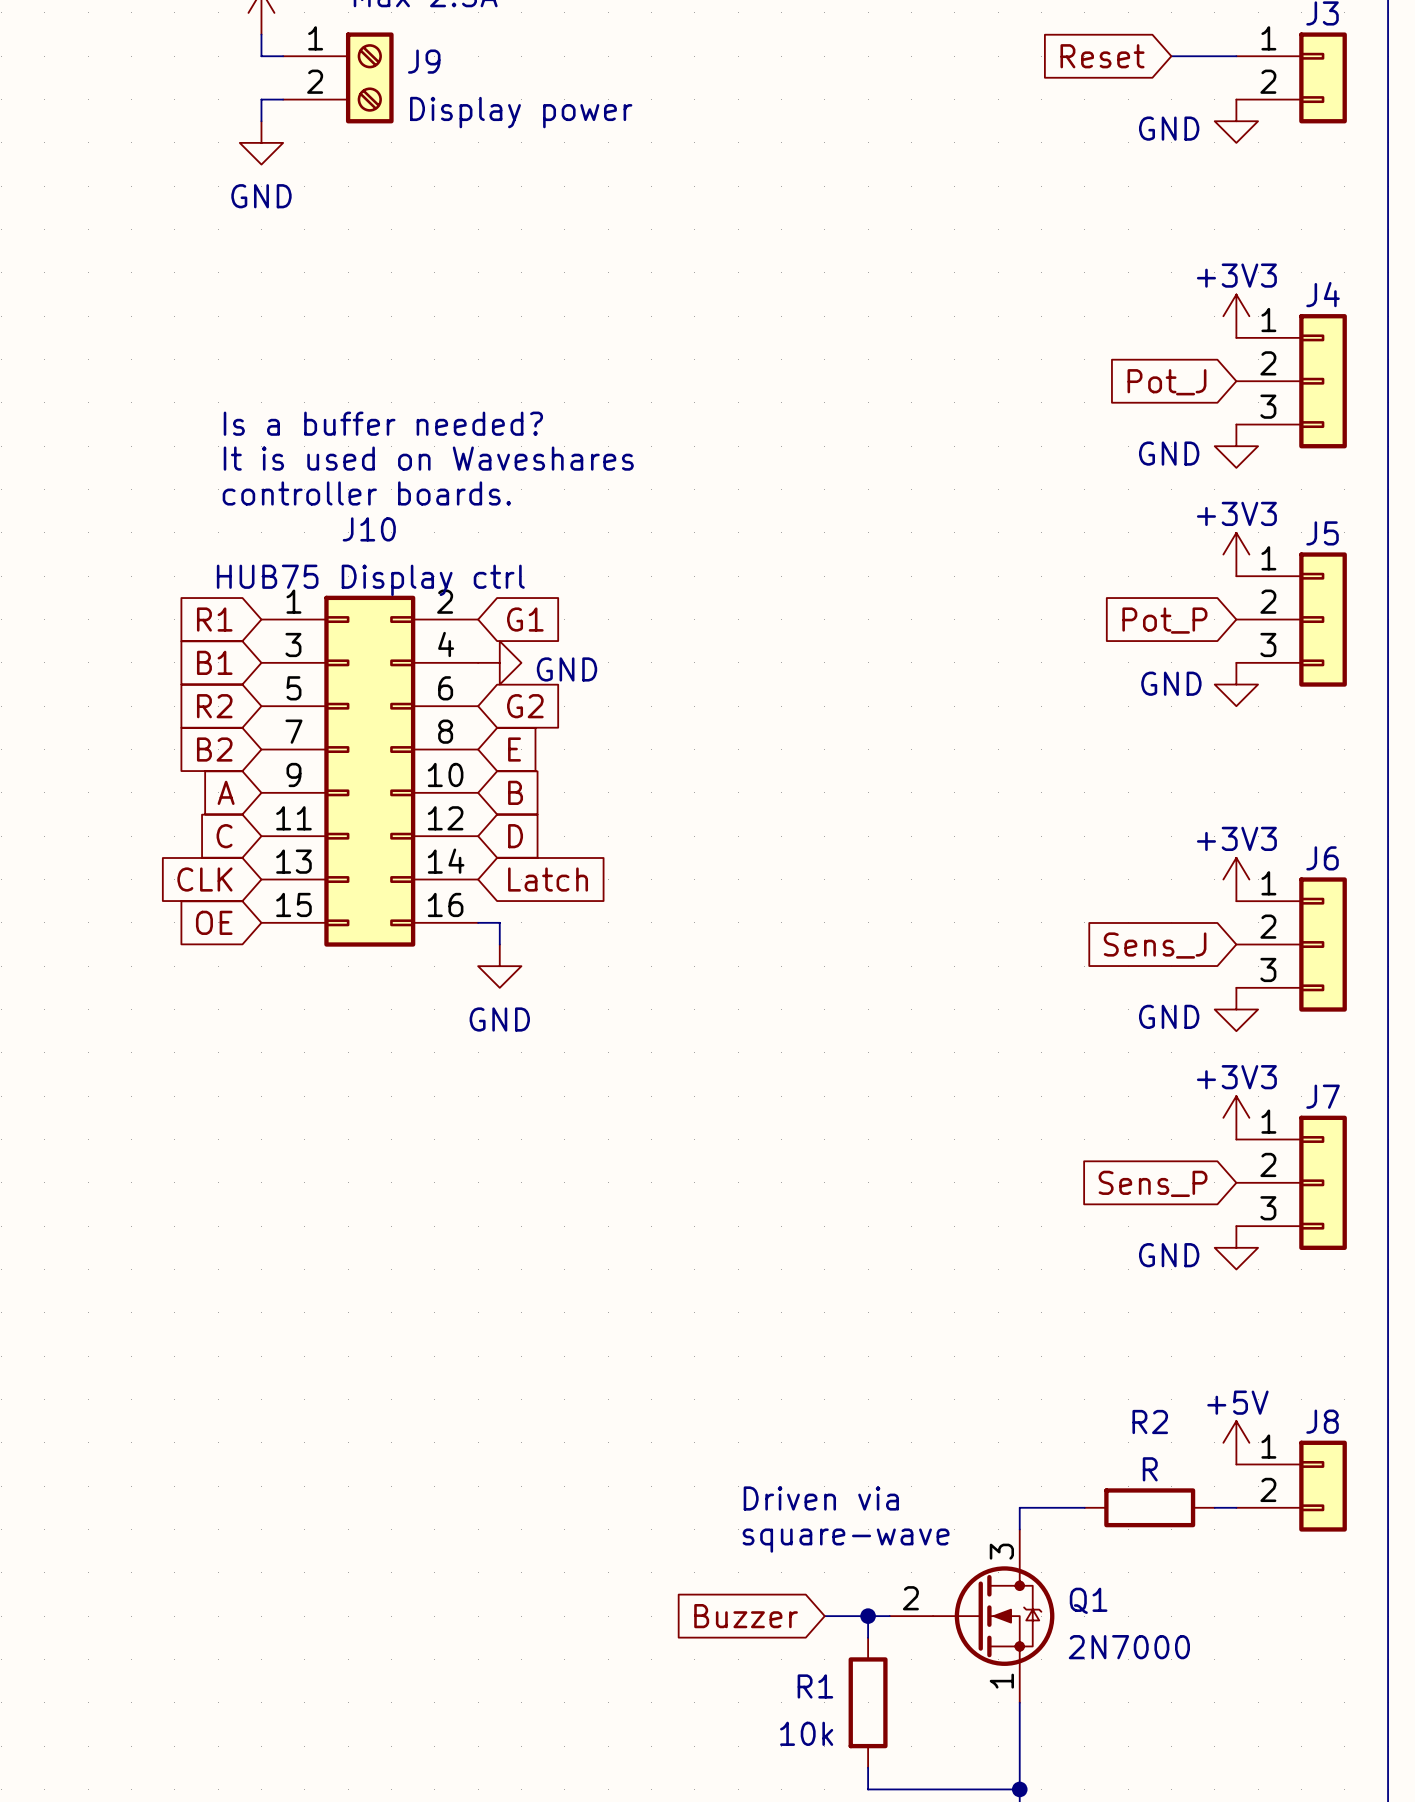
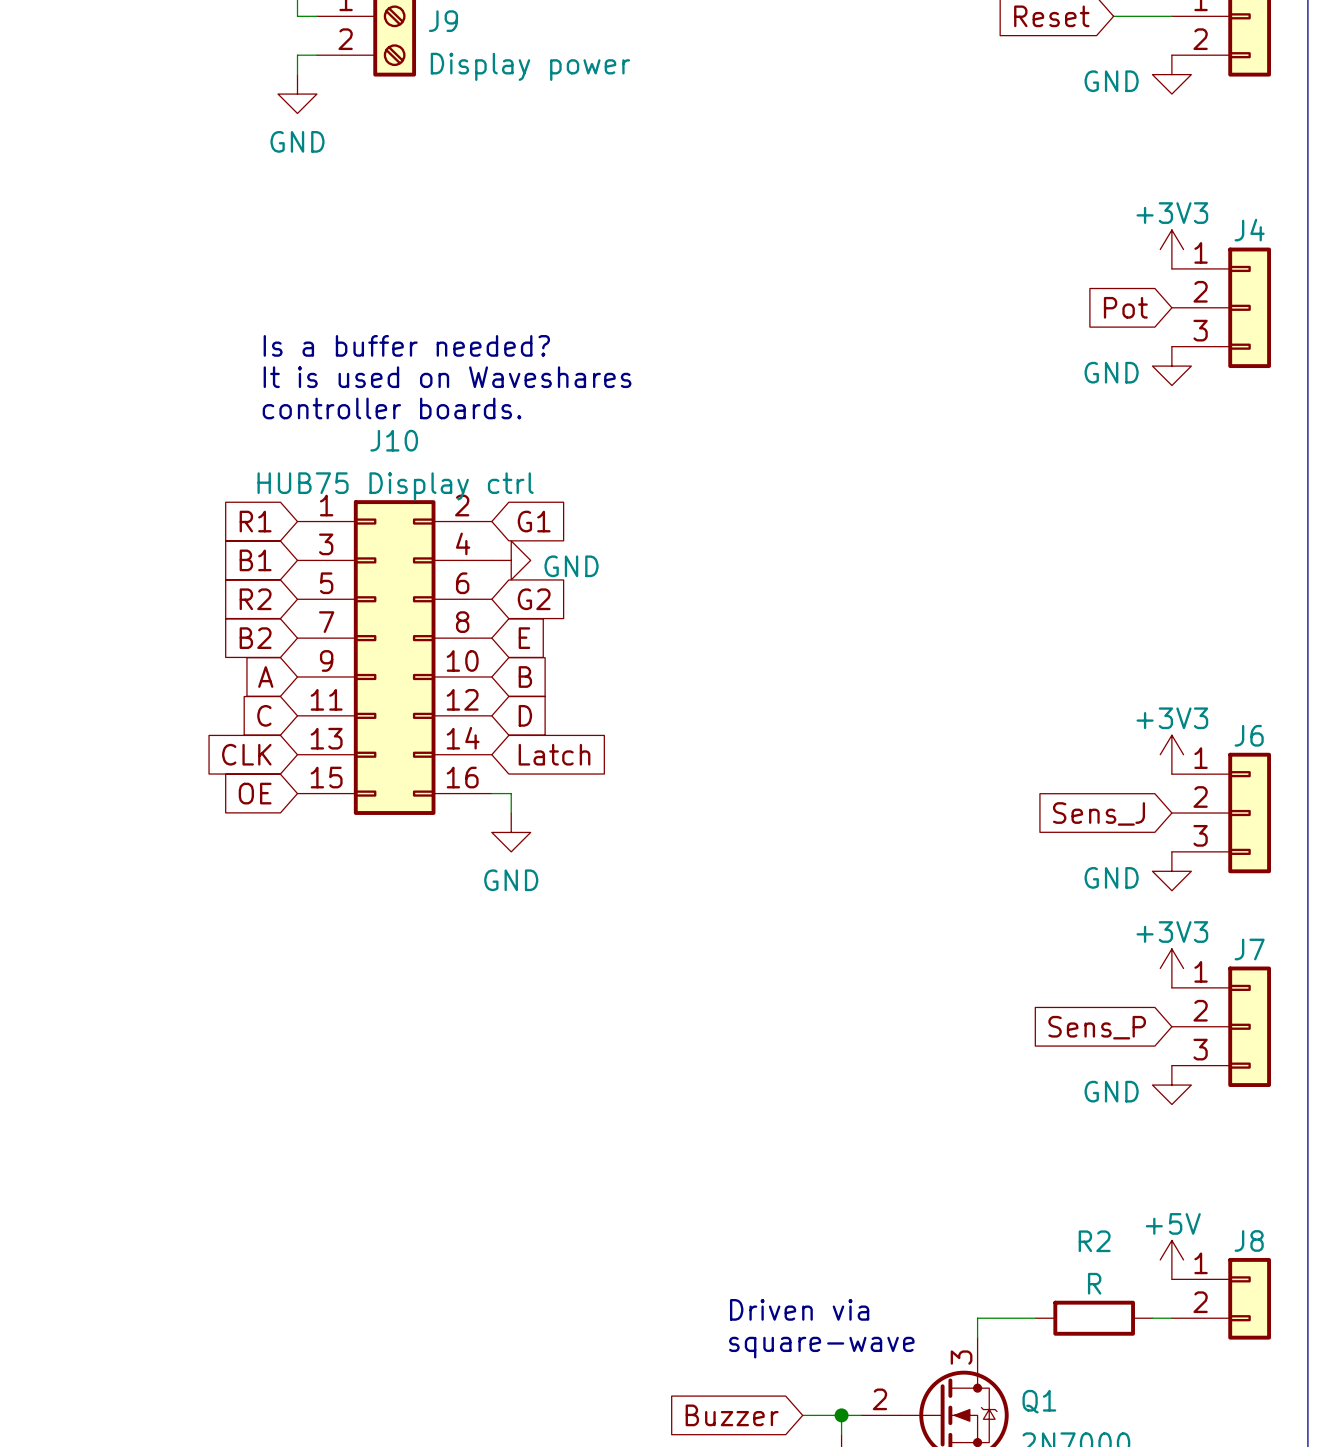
global label: Pot_J (1166, 382) -> Pot (1125, 307)
power symbol: +3V3 (1236, 554) -> none
J5: (1291, 619) -> none
global label: Pot_P (1164, 620) -> none
power symbol: GND (1236, 684) -> none

